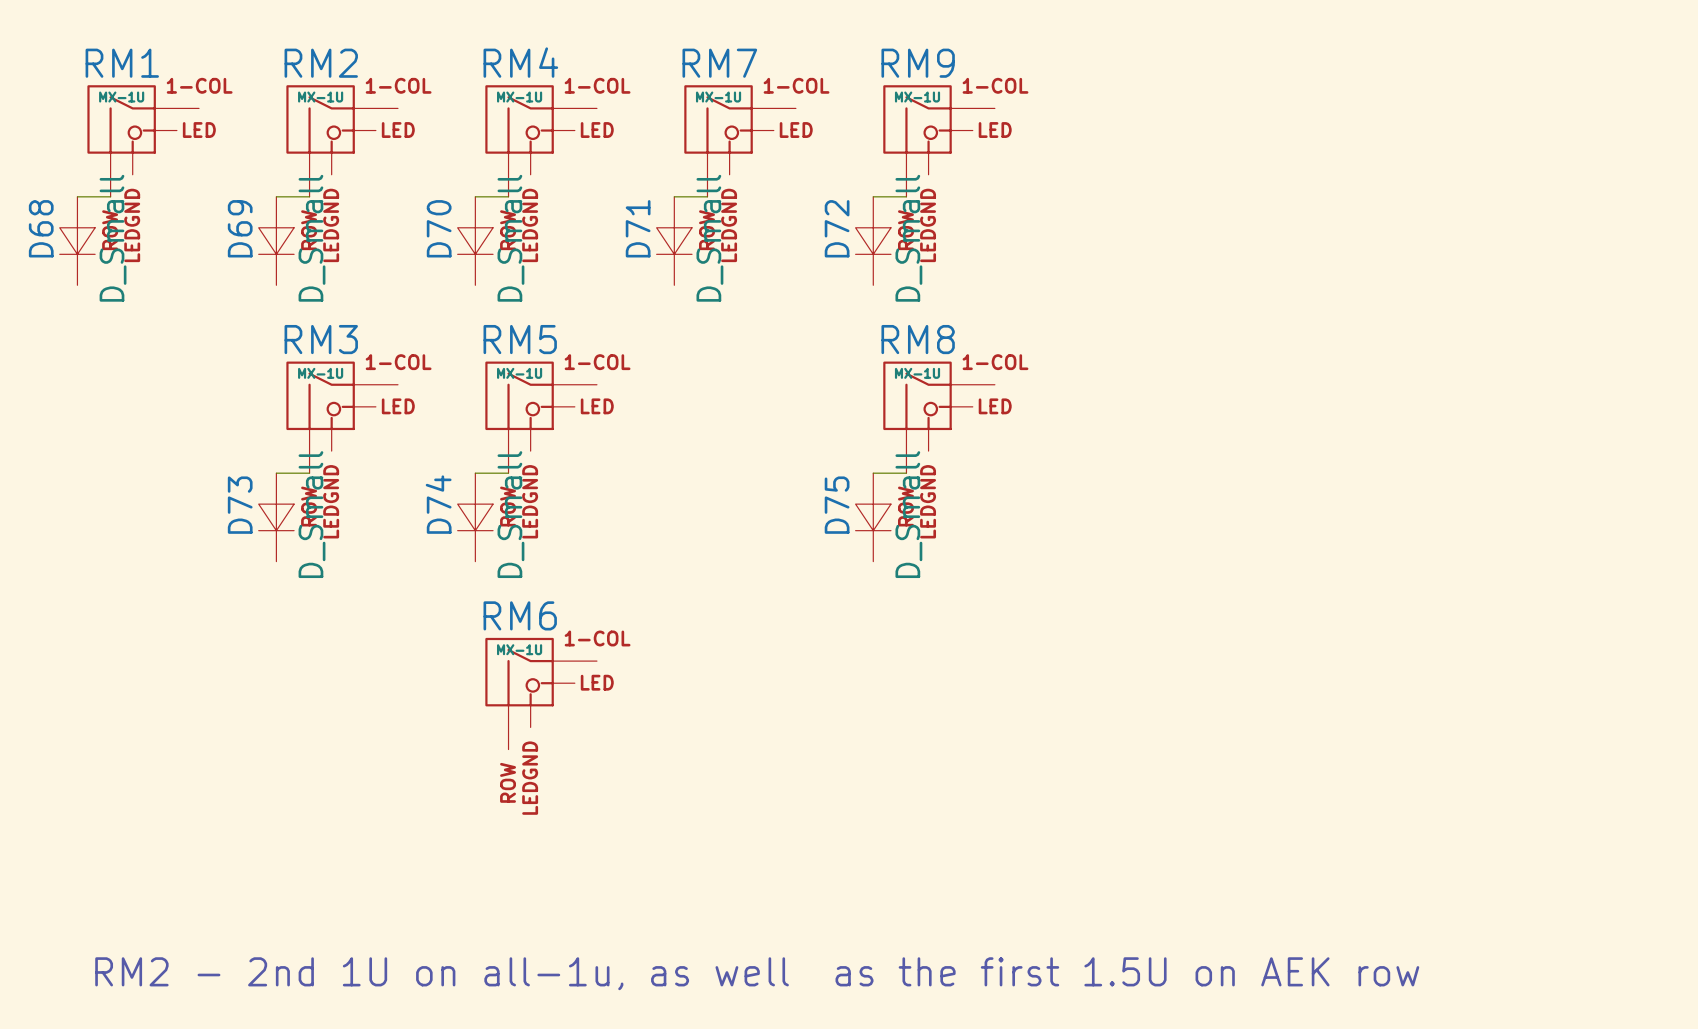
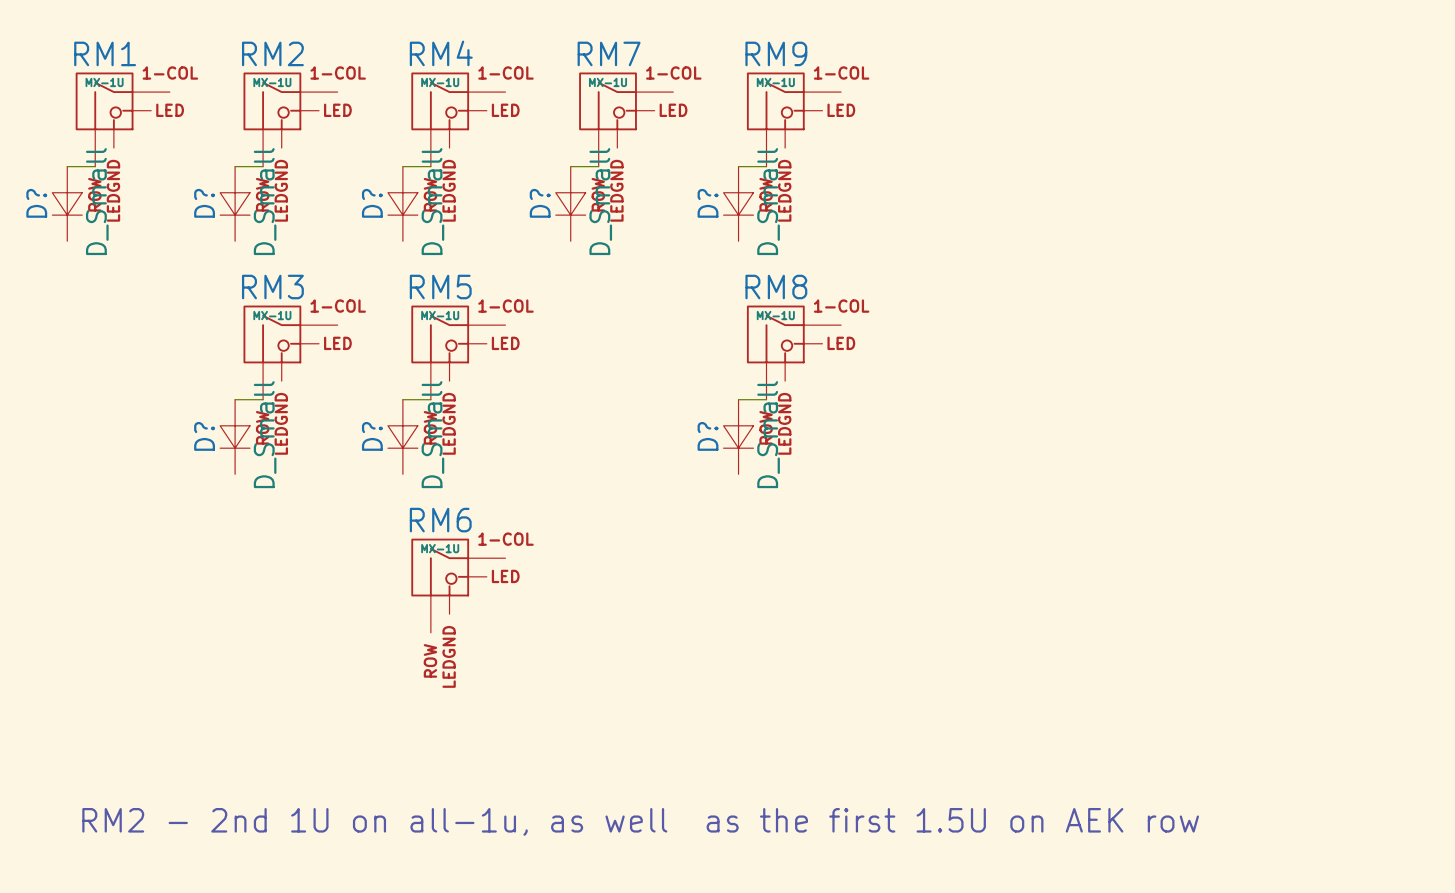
D68 name: D68 (41, 228) -> D? (36, 203)
D69 name: D69 (240, 228) -> D? (204, 203)
D70 name: D70 (439, 228) -> D? (372, 203)
D71 name: D71 (638, 228) -> D? (540, 203)
D72 name: D72 (837, 228) -> D? (708, 203)
D74 name: D74 (438, 504) -> D? (372, 436)
D73 name: D73 (240, 505) -> D? (204, 436)
D75 name: D75 (837, 505) -> D? (708, 436)

